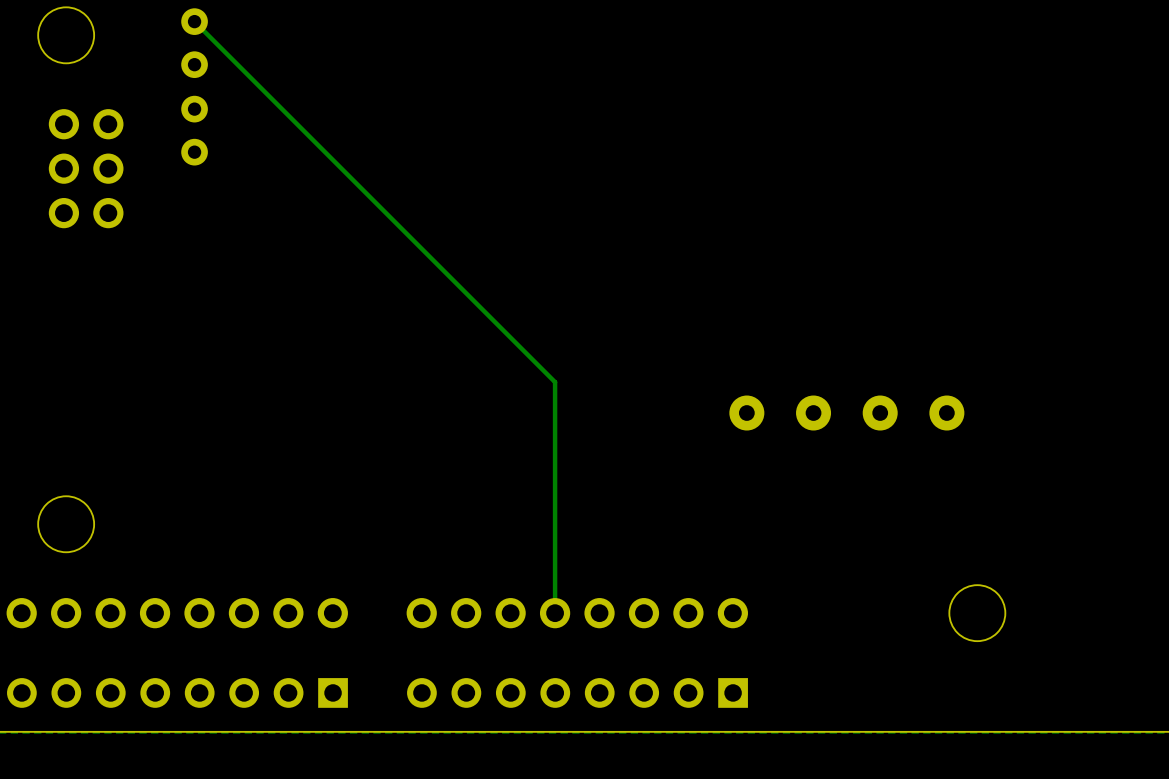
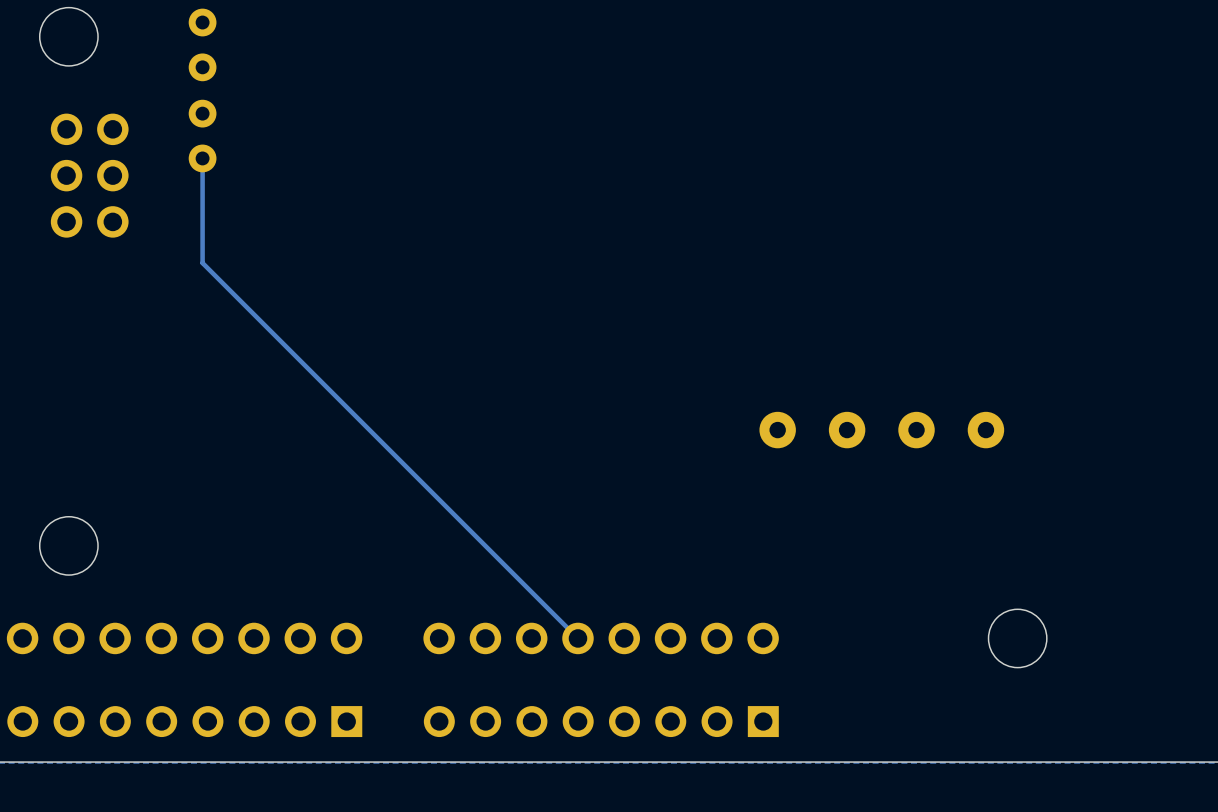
track: (194, 21) (555, 382) (555, 613) -> (202, 158) (202, 263) (577, 638)

